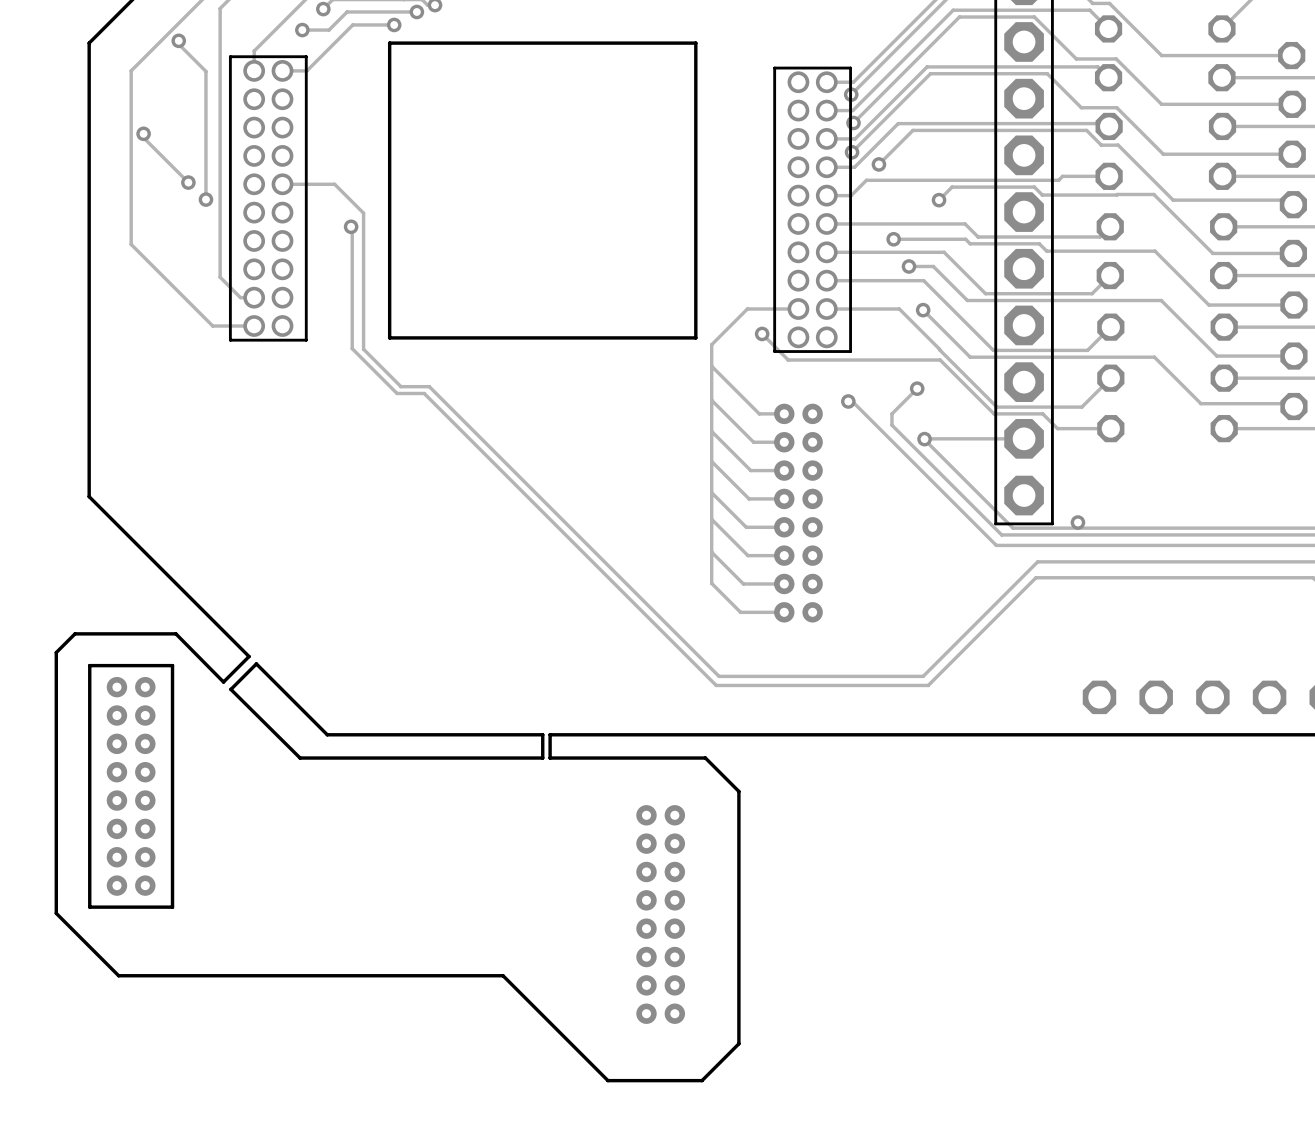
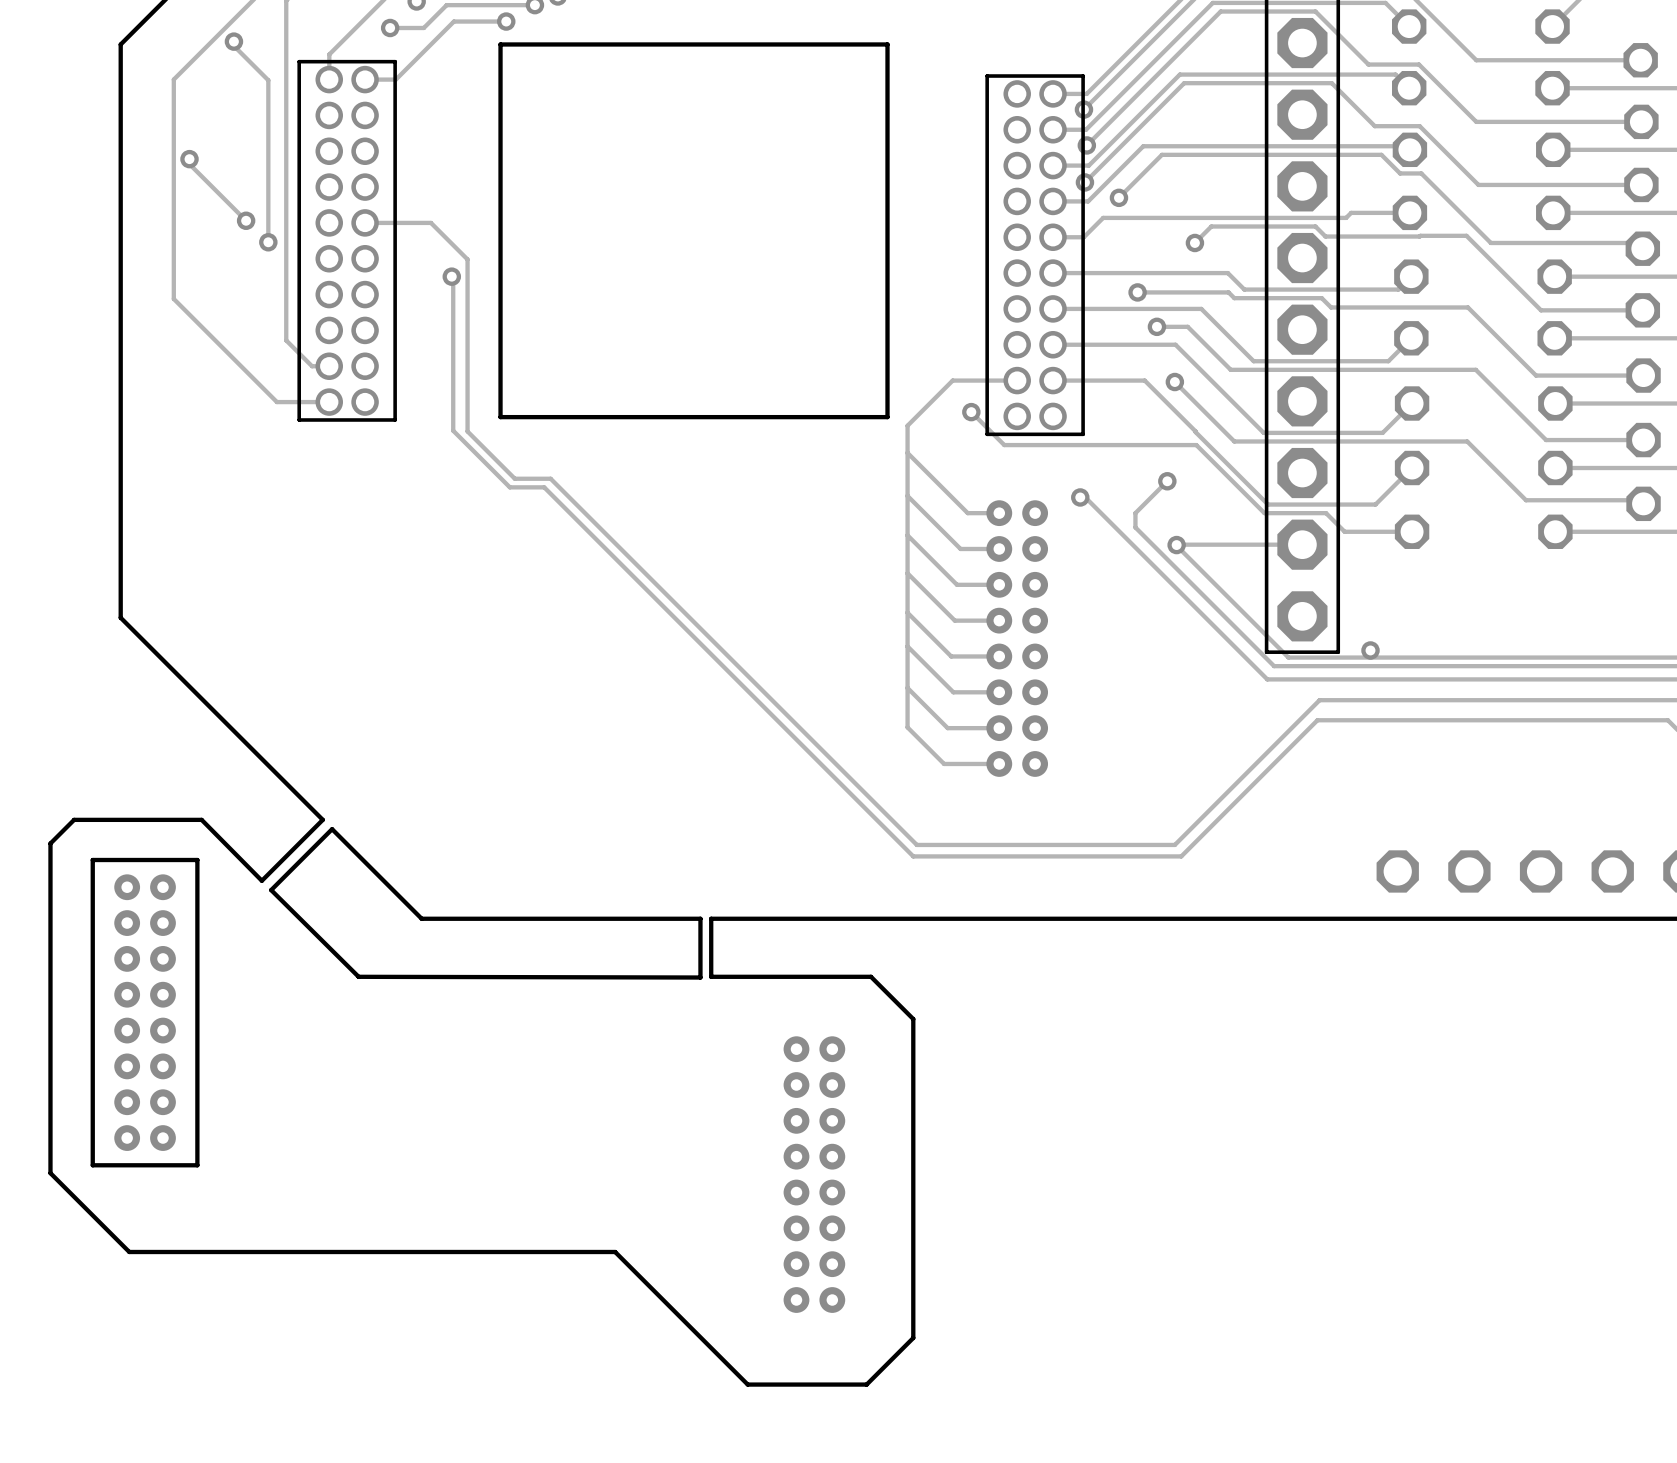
board edge: (223, 682) (175, 633) (75, 633) (56, 652) (56, 913) (118, 975) (503, 975) (607, 1080) (702, 1080) -> (290, 852) (261, 880) (201, 819) (74, 819) (50, 843) (50, 1173) (129, 1251) (615, 1251) (747, 1384) (866, 1384) (895, 1355)
board edge: (230, 689) (300, 758) (542, 758) (542, 734) -> (299, 861) (271, 890) (358, 976) (700, 977) (700, 918) (694, 918)
board edge: (556, 734) (550, 734) (550, 758) (705, 758) (738, 791) (738, 1043) (716, 1066) -> (711, 918) (711, 976) (871, 976) (913, 1019) (913, 1337)
part position: (131, 786) -> (145, 1012)
part position: (660, 914) -> (814, 1174)

